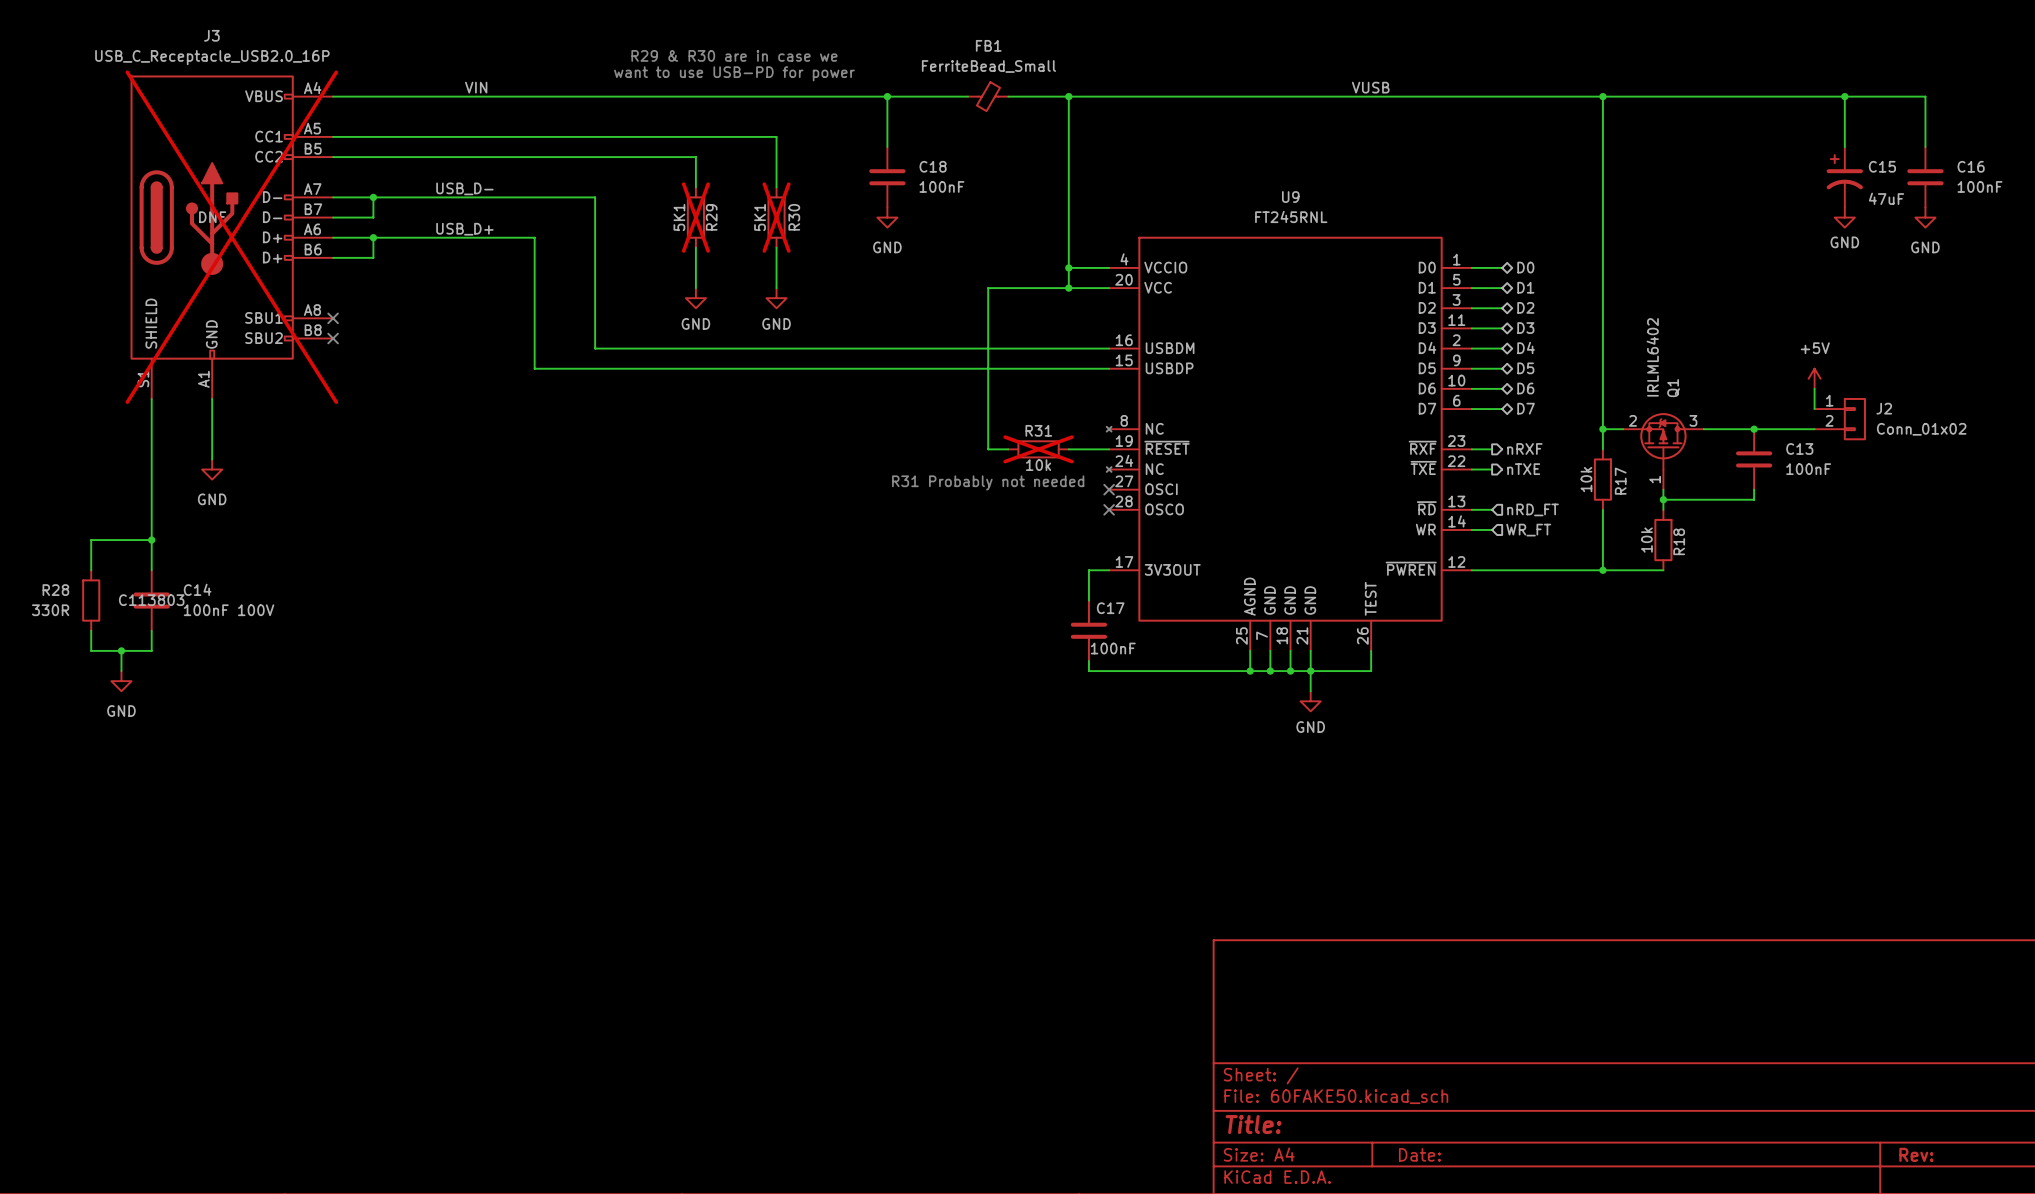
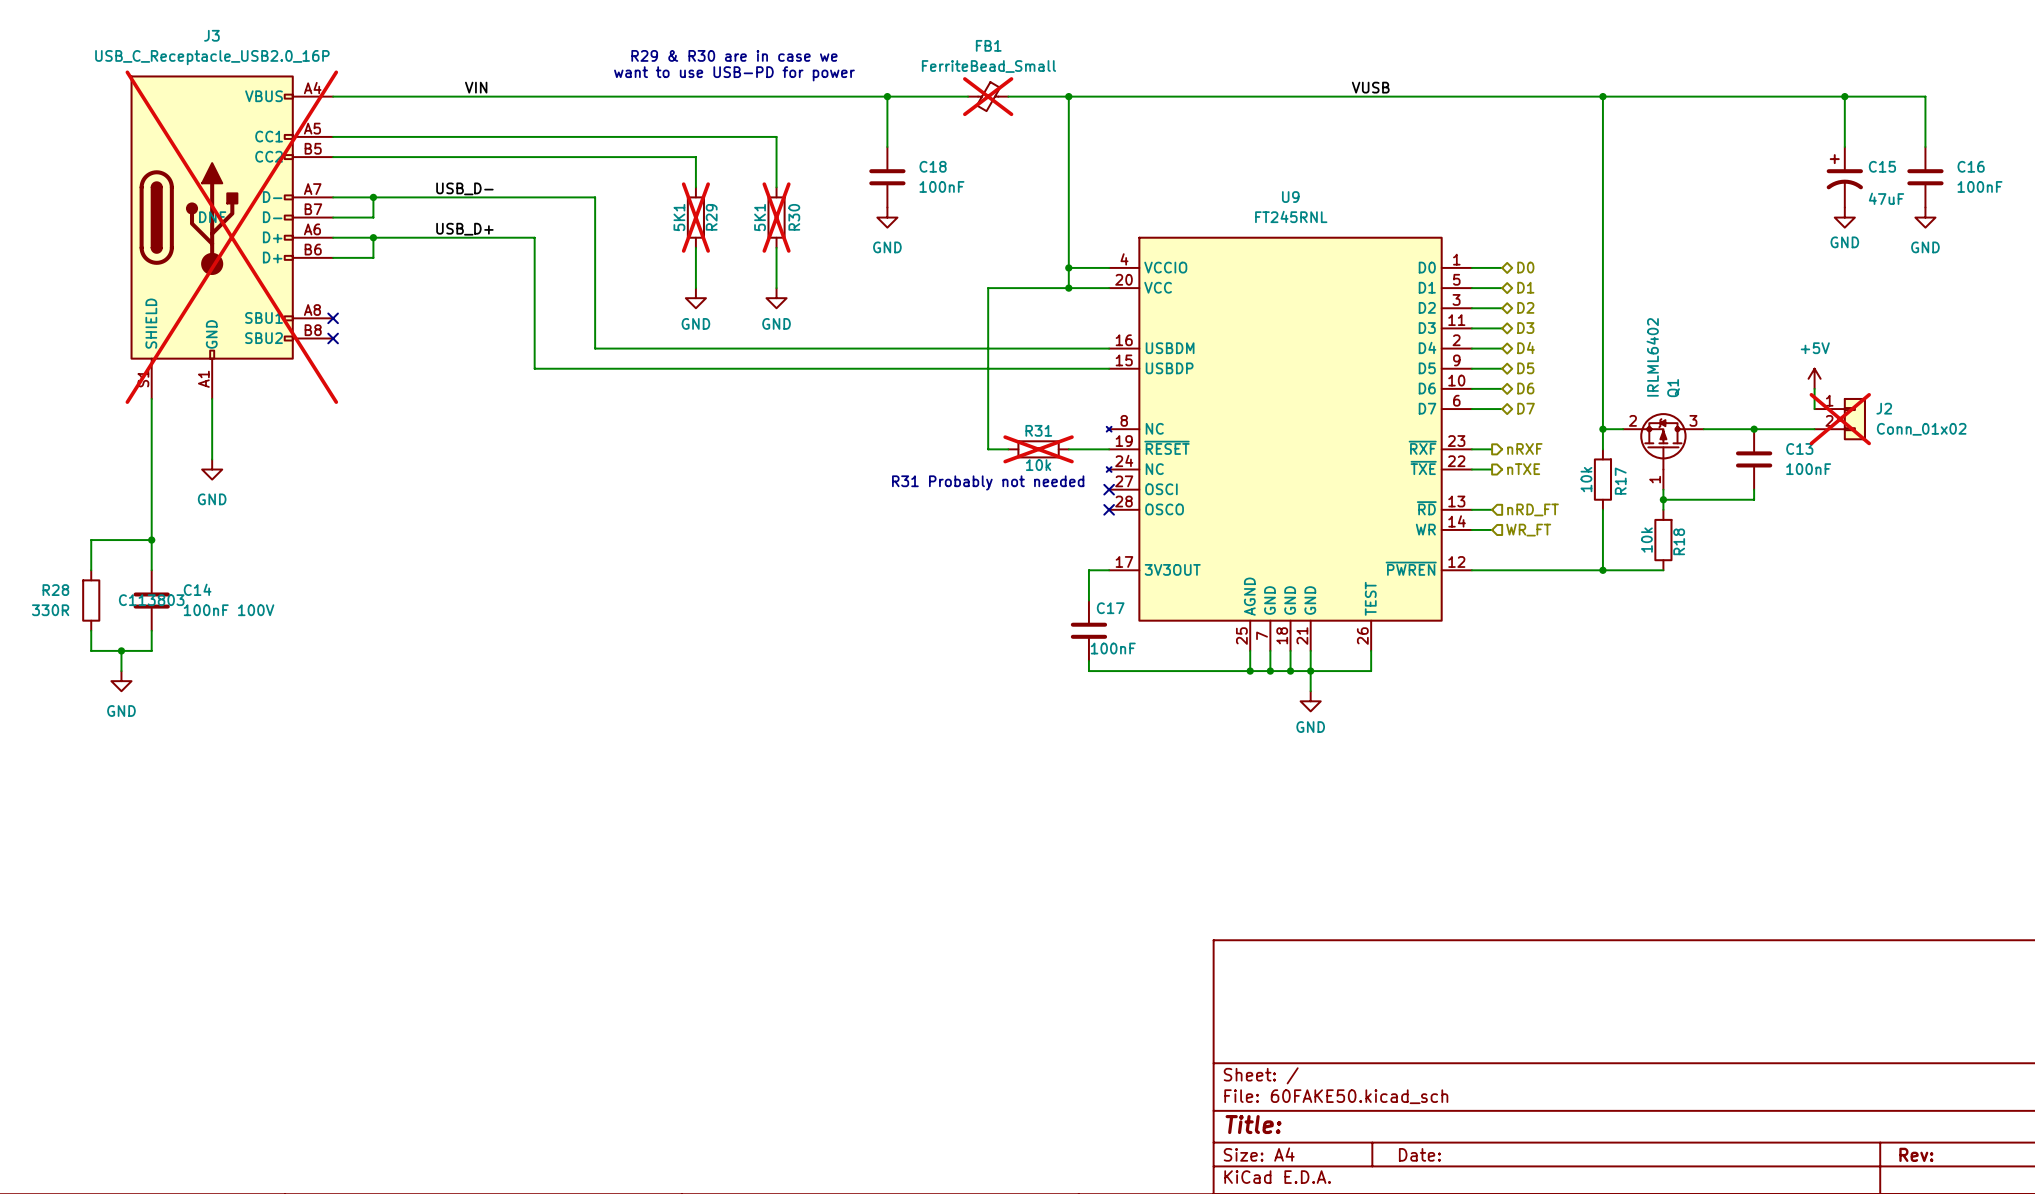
FB1 do-not-place cross: none -> (988, 96)
J2 do-not-place cross: none -> (1840, 419)

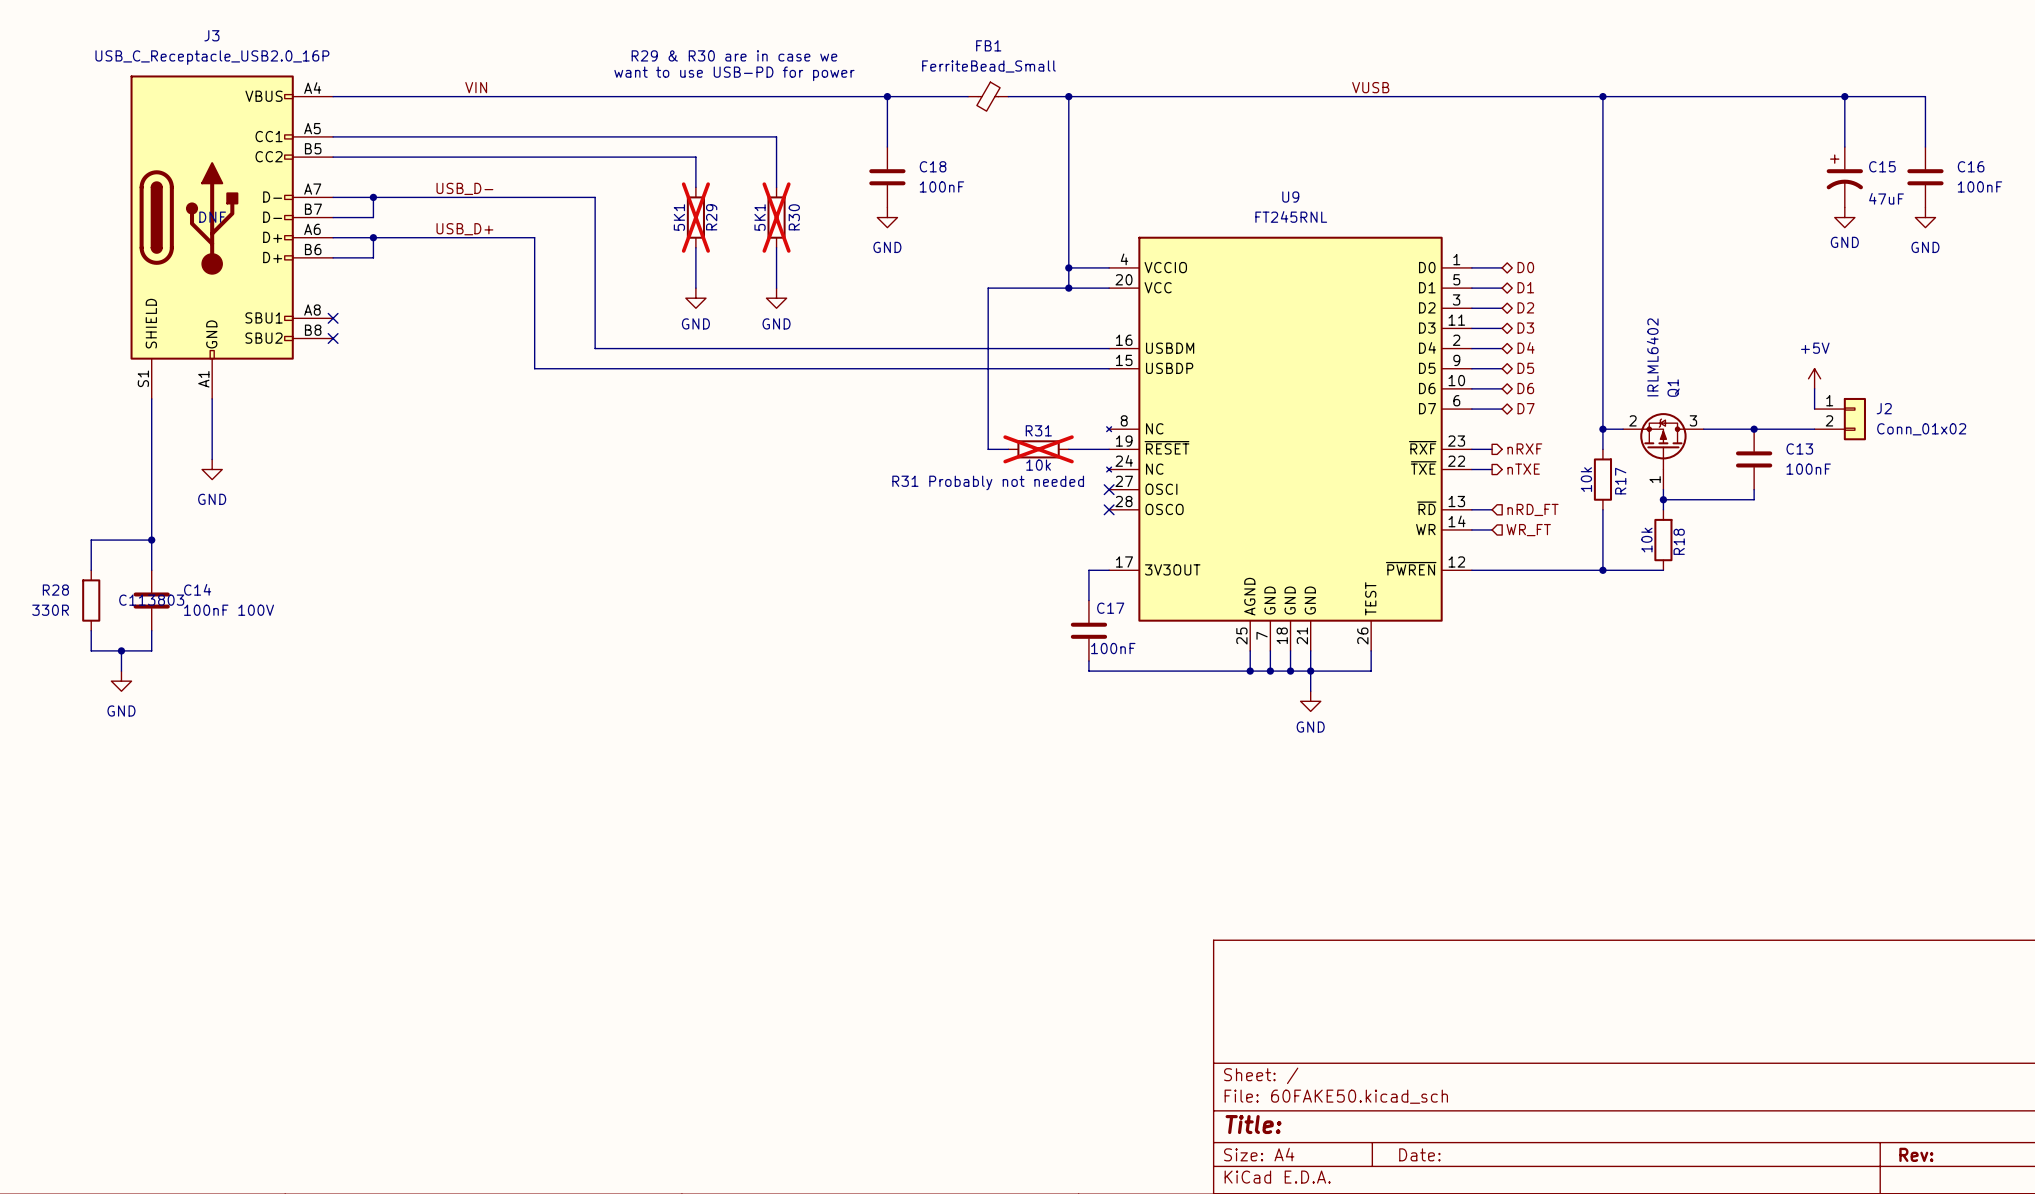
FB1 do-not-place cross: (988, 96) -> none
J3 do-not-place cross: (231, 237) -> none
J2 do-not-place cross: (1840, 419) -> none

